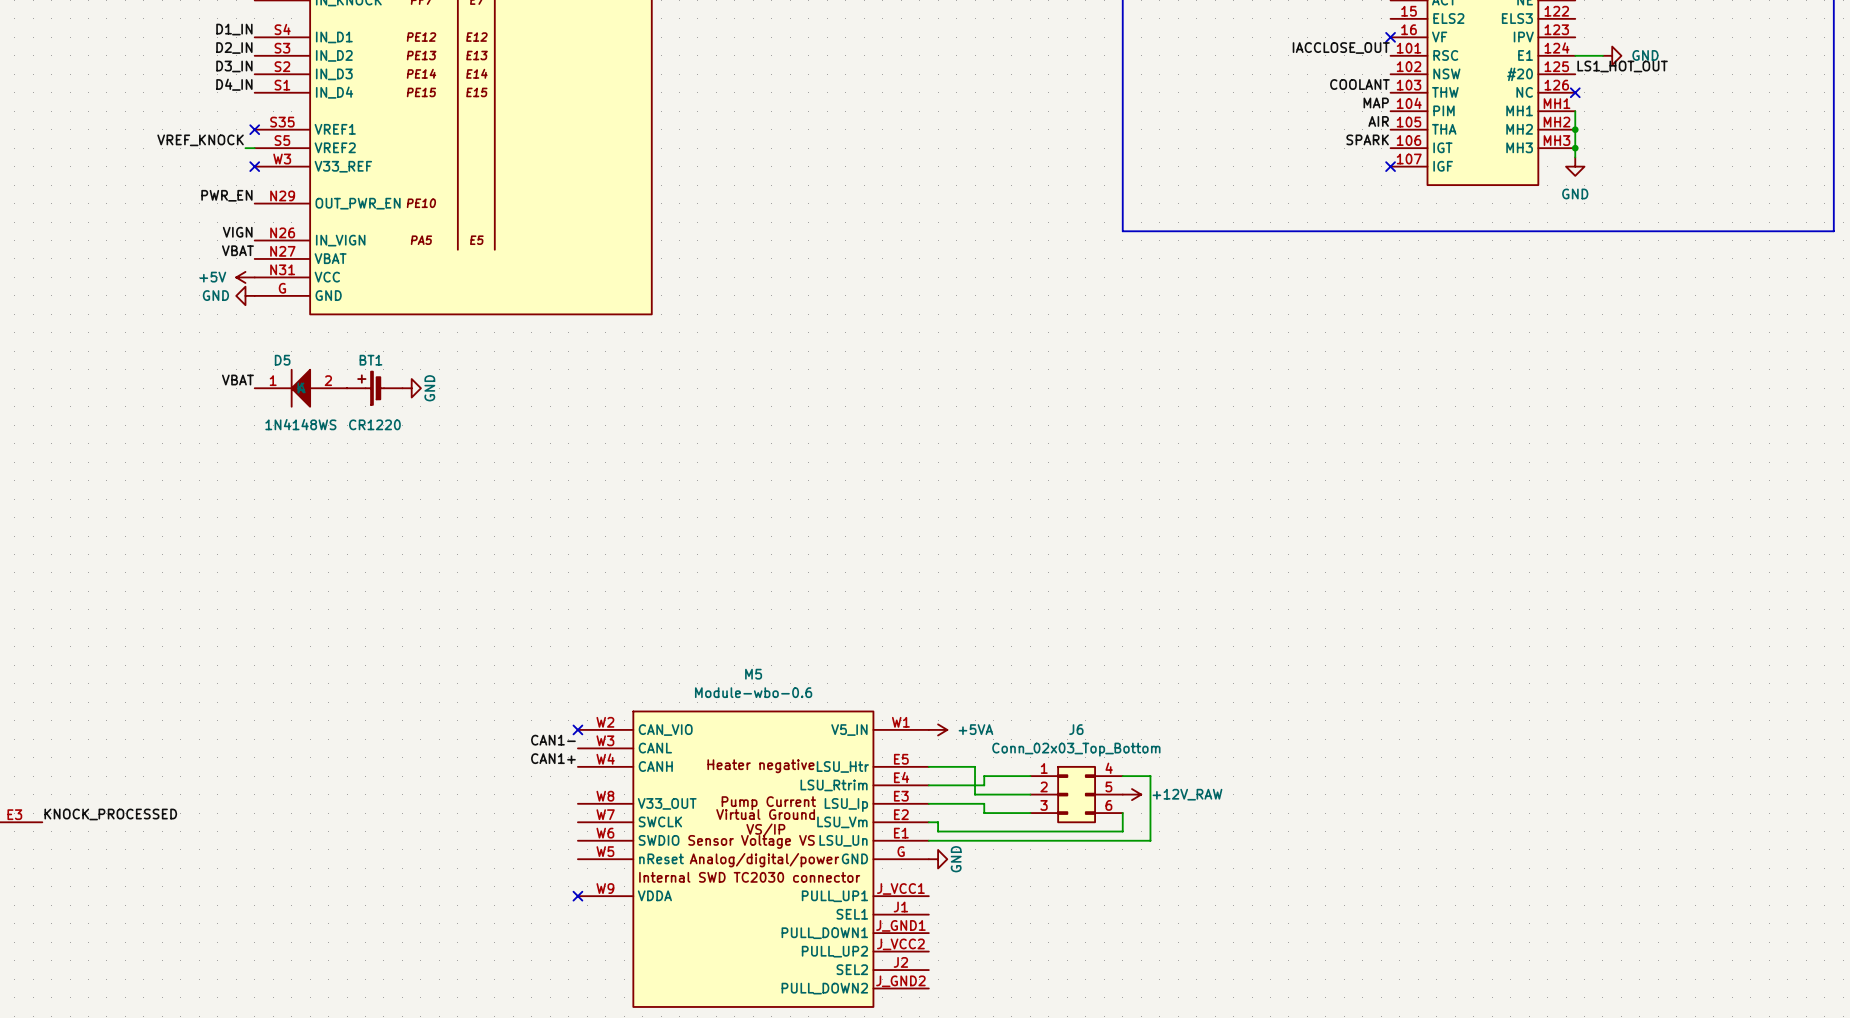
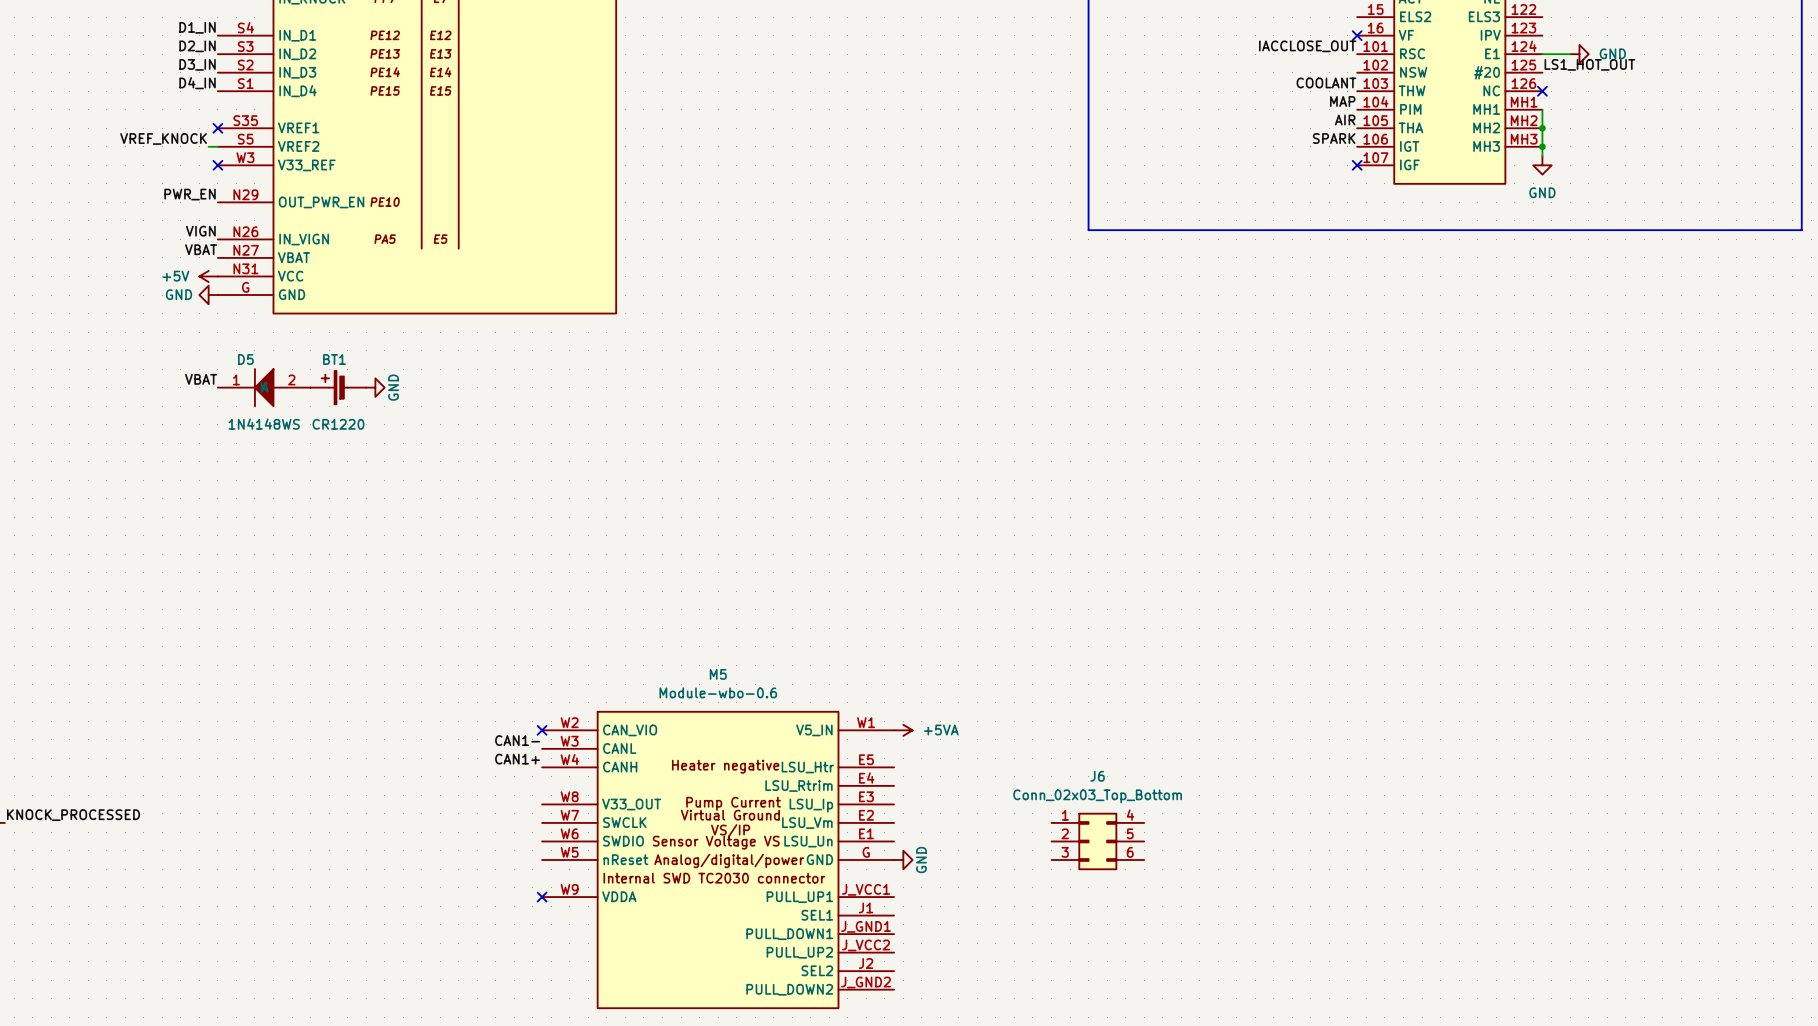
wire: (928, 766) (975, 766) (975, 794) (1030, 794) -> none
wire: (1030, 776) (984, 776) (984, 785) (928, 785) -> none
wire: (1122, 776) (1150, 776) (1150, 840) (928, 840) -> none
J6 position: (1076, 794) -> (1097, 841)
power symbol: +12V_RAW (1131, 794) -> none
wire: (928, 803) (984, 803) (984, 813) (1030, 813) -> none
wire: (1122, 813) (1122, 831) (938, 831) (938, 822) (928, 822) -> none

